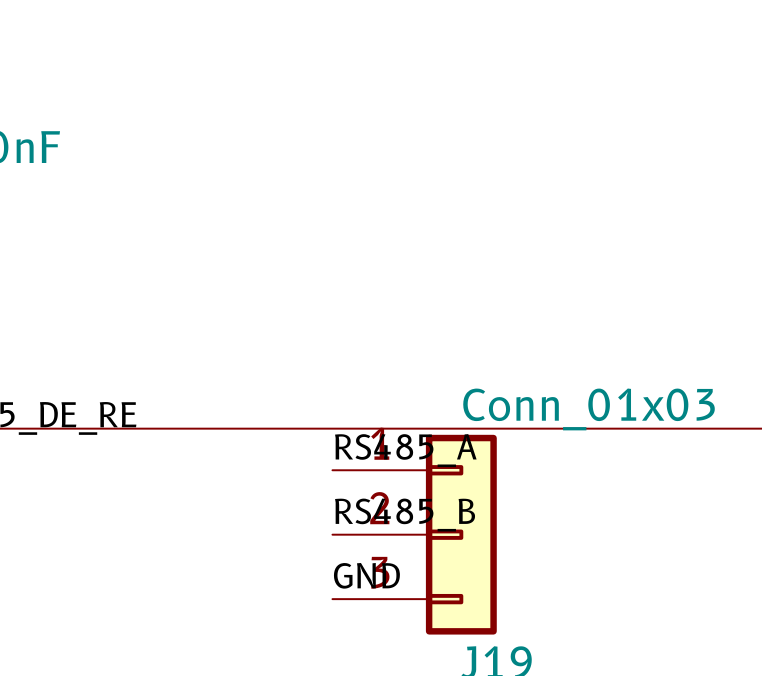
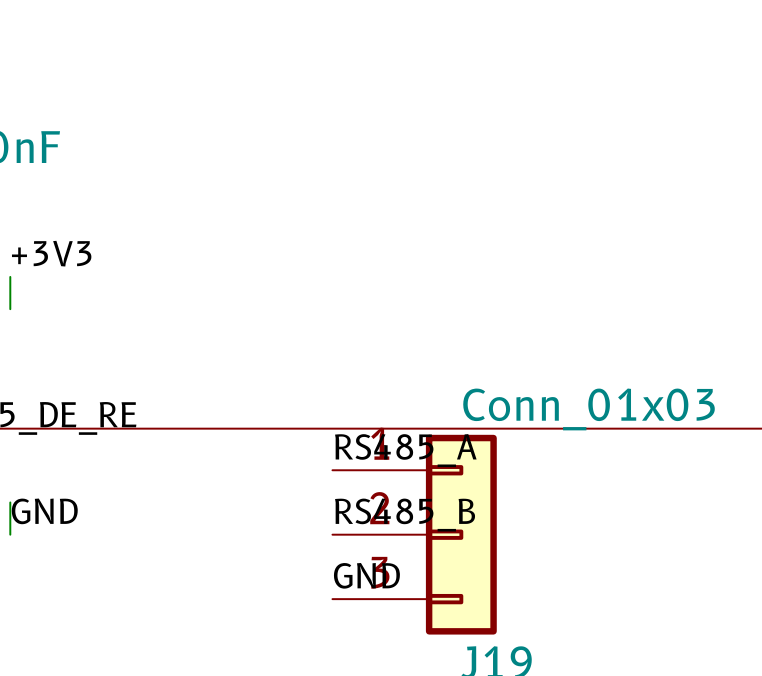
label: none -> +3V3 (51, 253)
wire: none -> (10, 276) (10, 309)
wire: none -> (10, 502) (10, 534)
label: none -> GND (44, 511)

